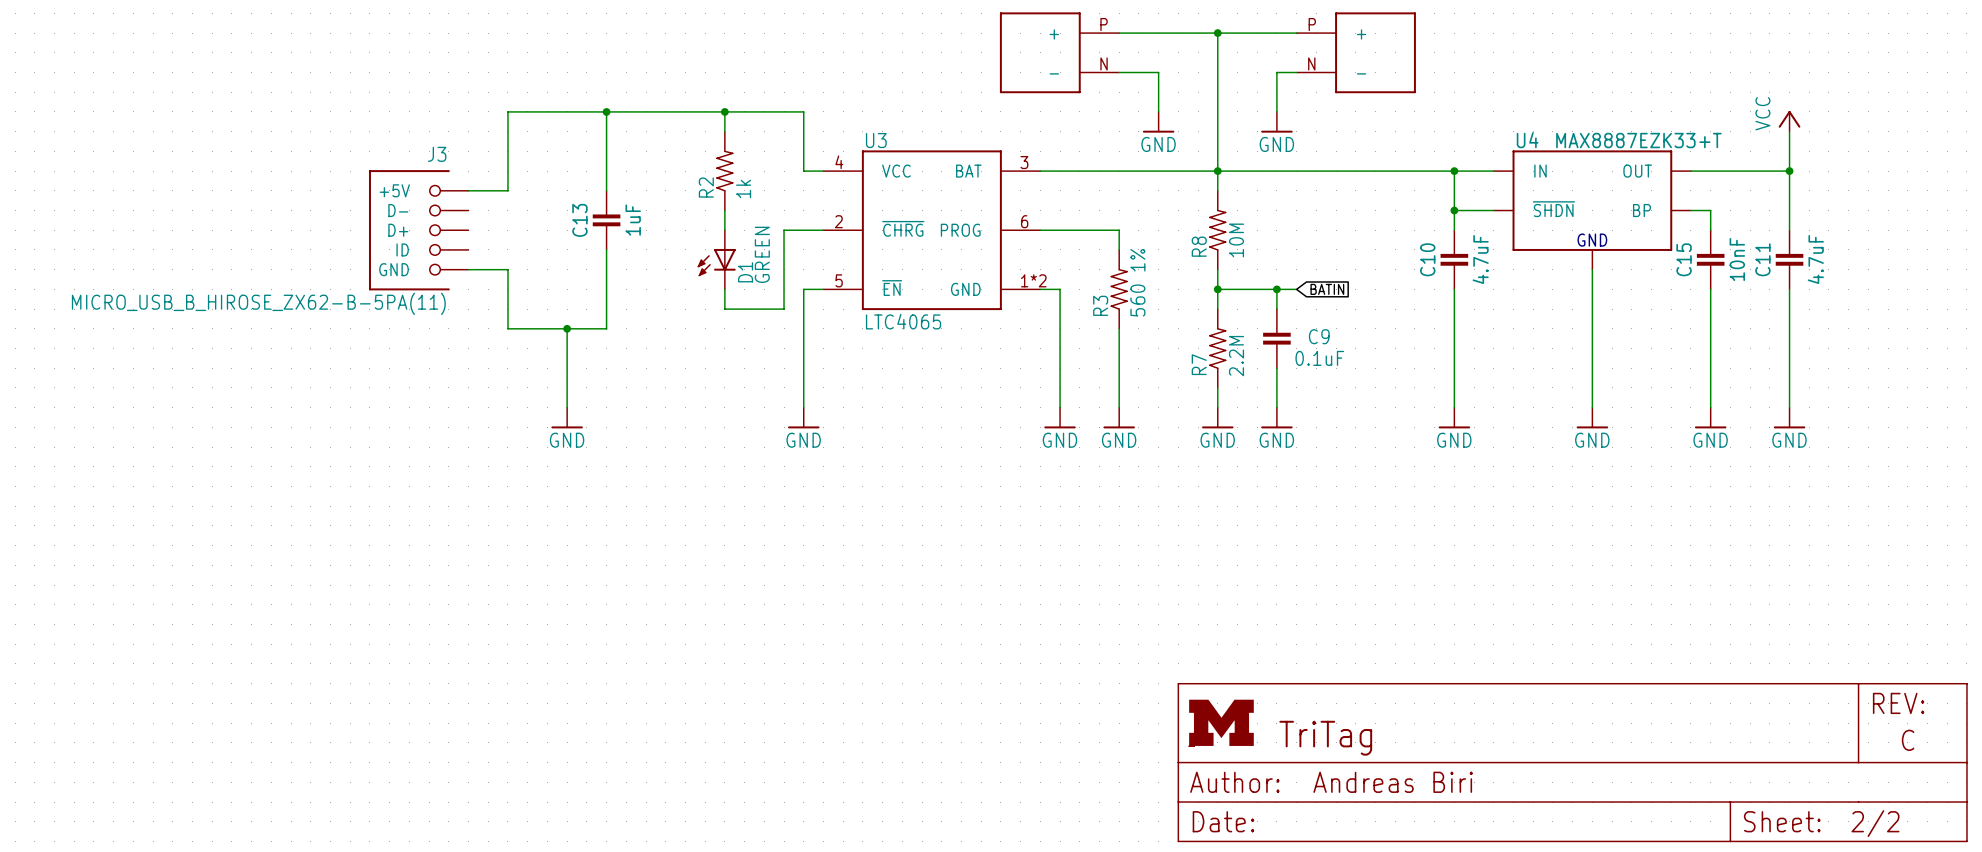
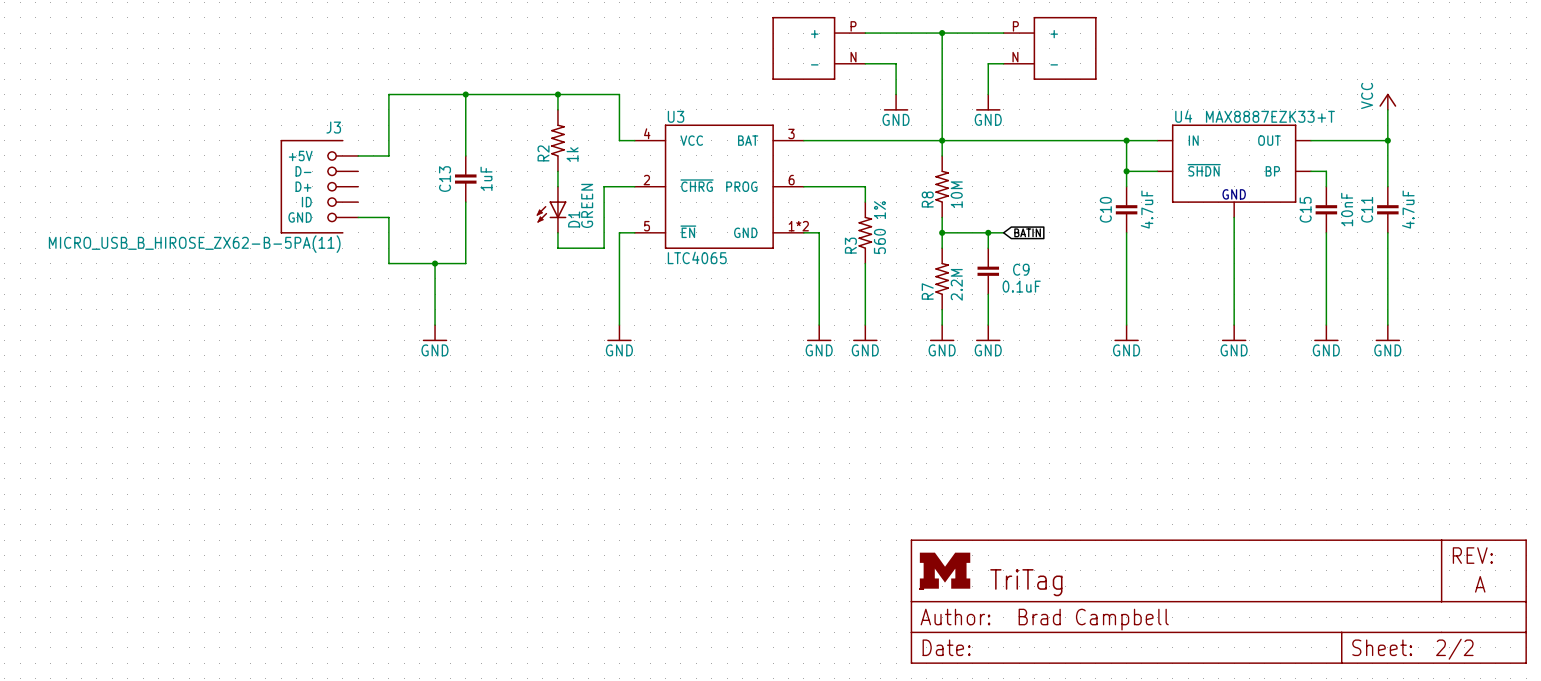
part text: C (1908, 740) -> A (1480, 584)
part text: Andreas Biri (1393, 782) -> Brad Campbell (1093, 619)

